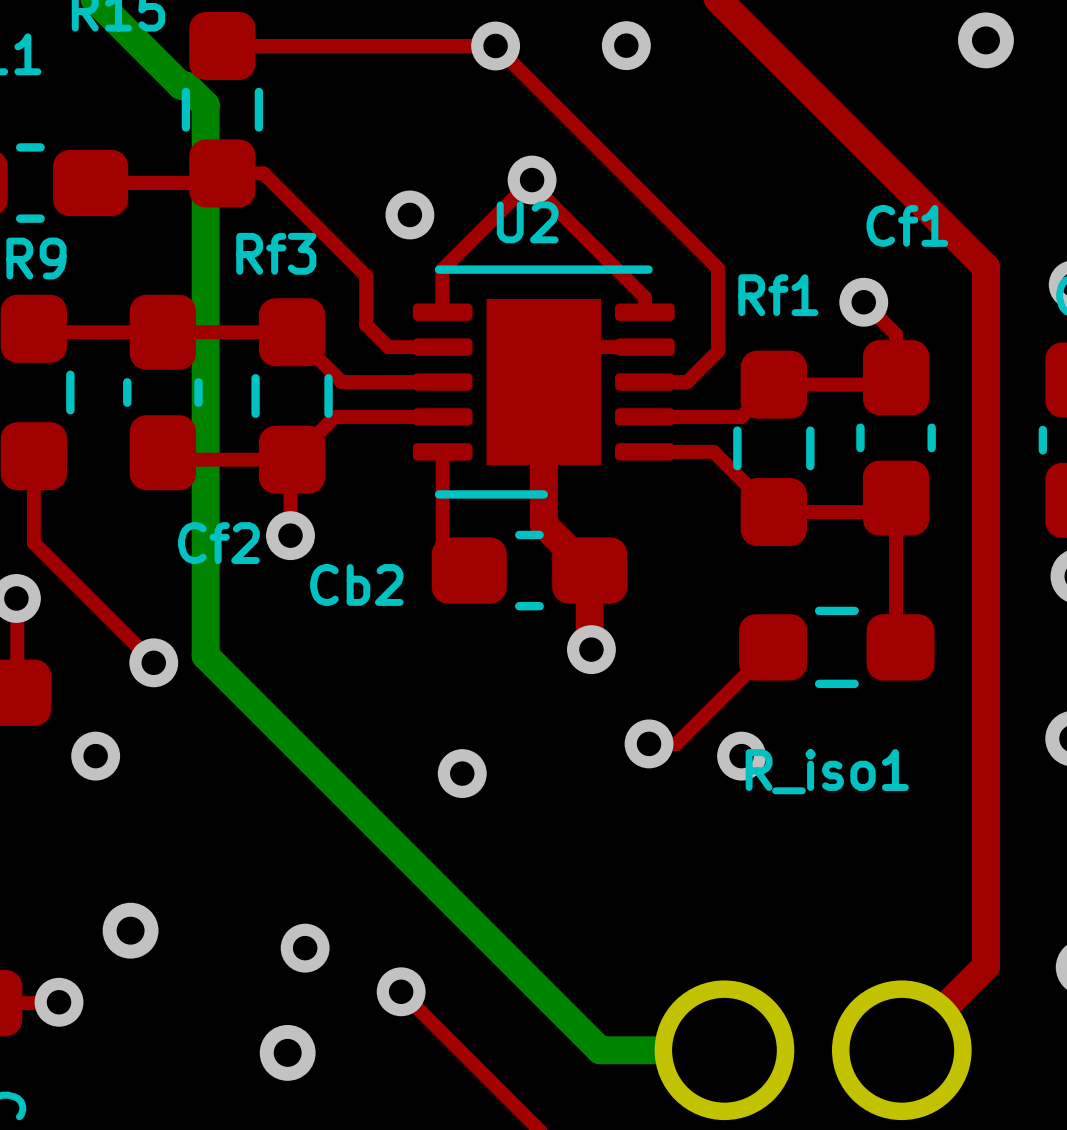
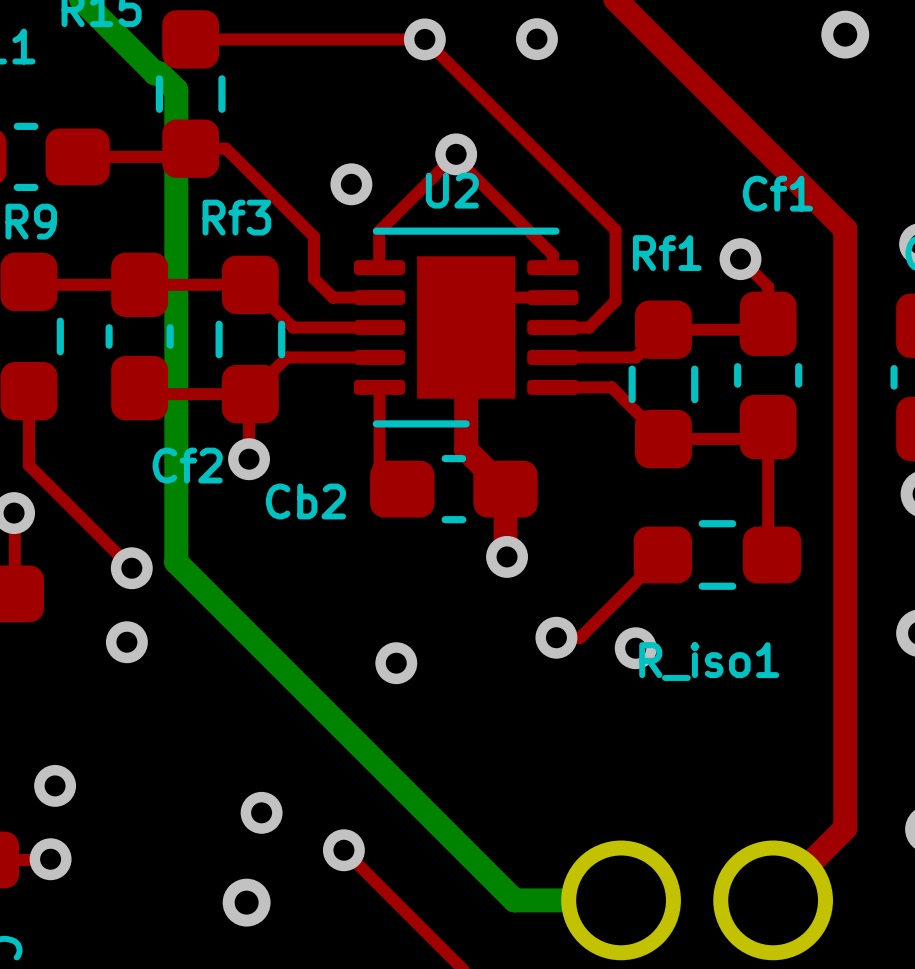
via position: (95, 756) -> (126, 642)
via: none -> (55, 785)
via: (130, 930) -> none

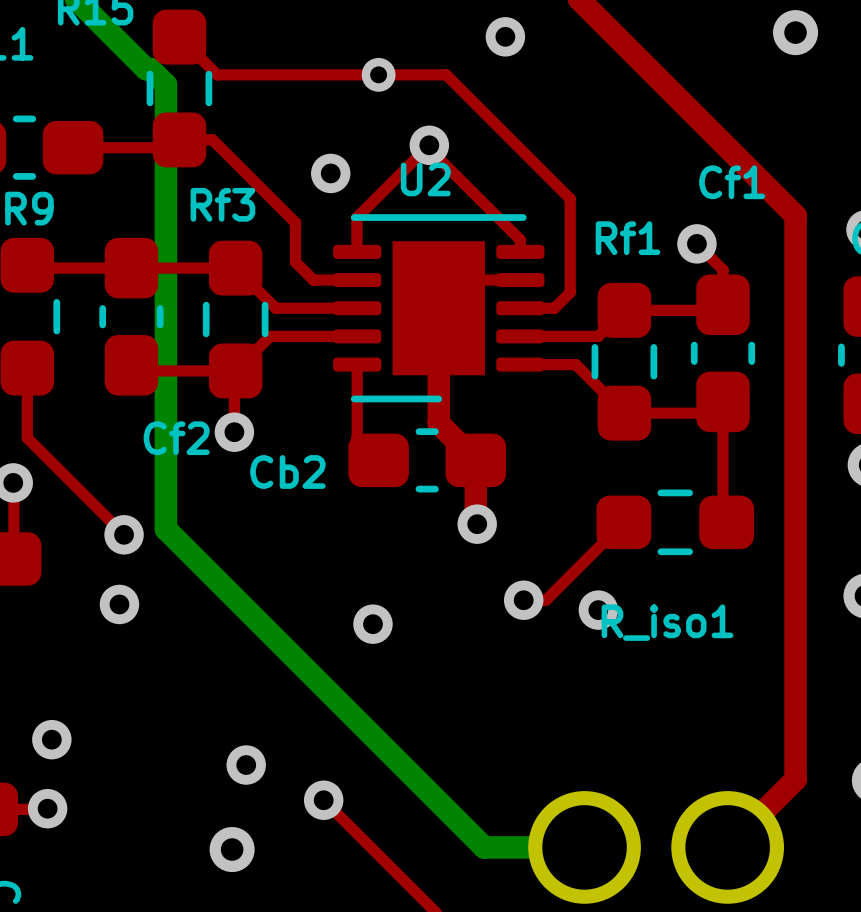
top track: (190, 39) (424, 39) (615, 230) (615, 301) (605, 310) -> (179, 37) (217, 74) (446, 74) (570, 198) (570, 292)
via: (424, 39) -> none
via: none -> (378, 74)

